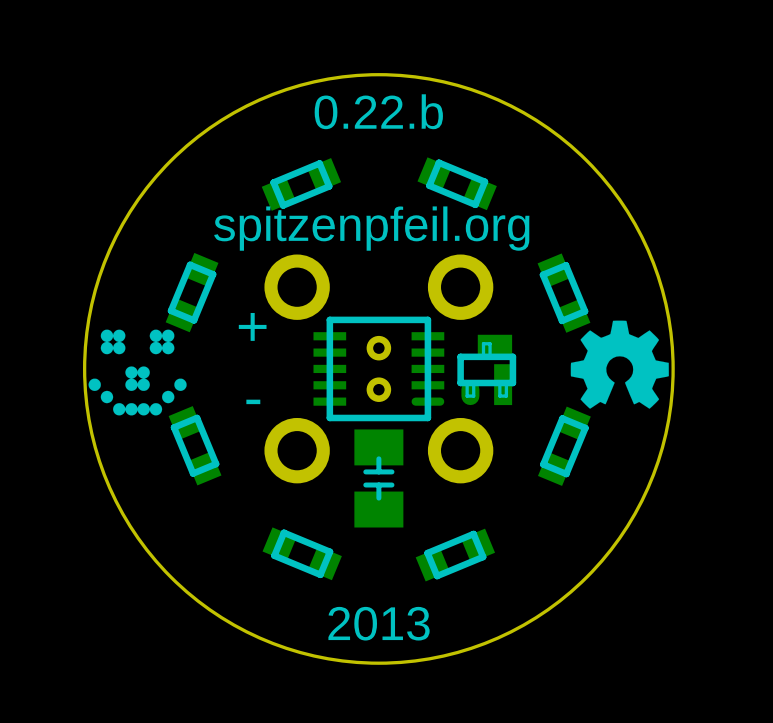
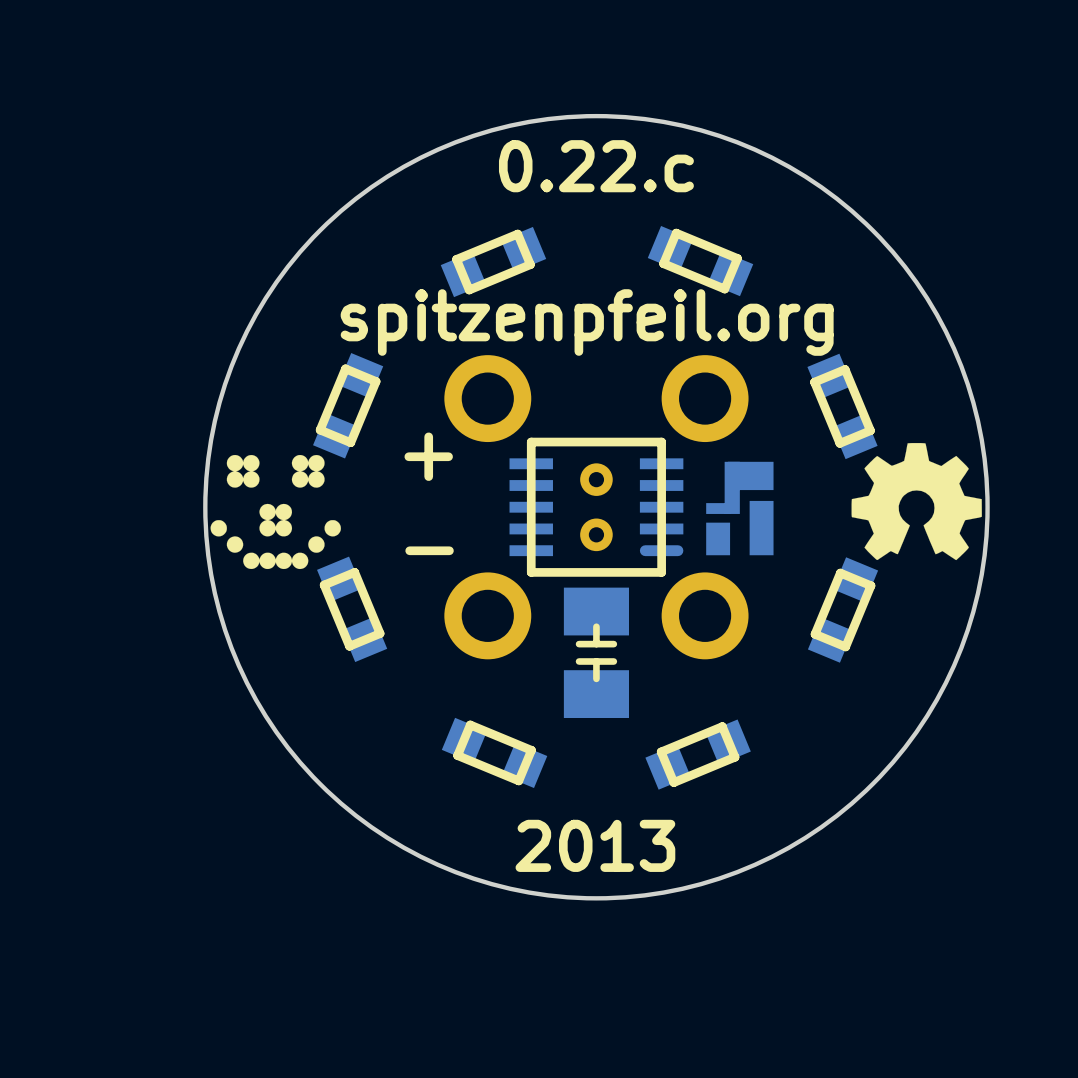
text: 0.22.b (378, 111) -> 0.22.c (596, 166)
part footprint: [457, 334, 517, 406] -> [706, 461, 774, 556]

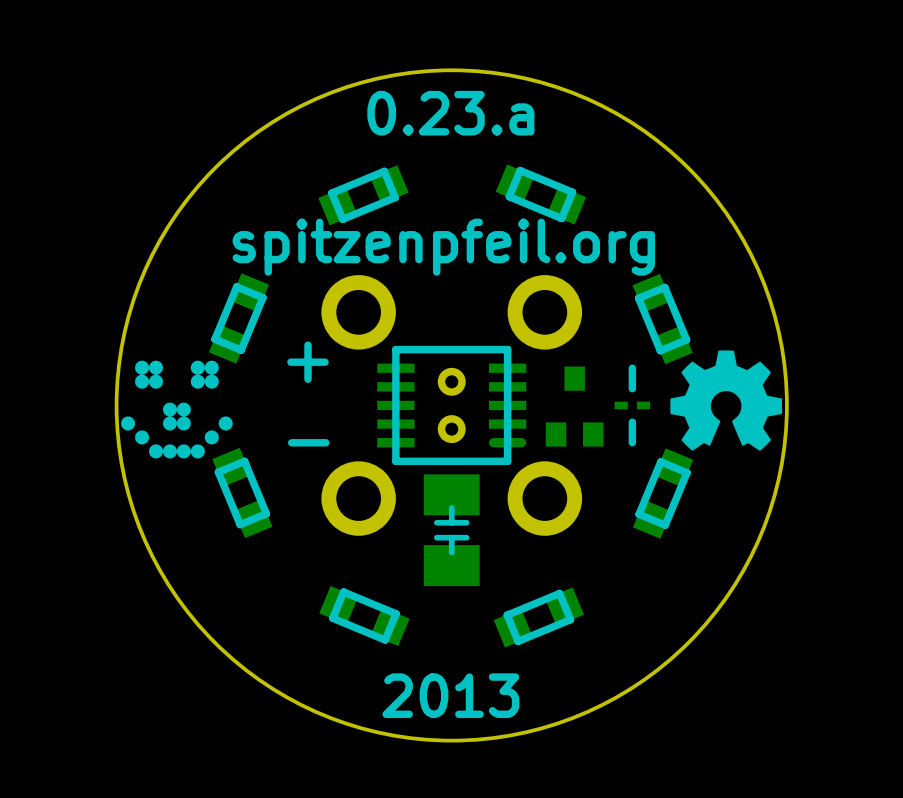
text: 0.22.c (596, 166) -> 0.23.a (450, 113)
part footprint: [706, 461, 774, 556] -> [545, 366, 604, 447]
line: none -> (632, 368) (632, 388)
part: none -> (632, 405)
line: none -> (632, 422) (632, 442)

